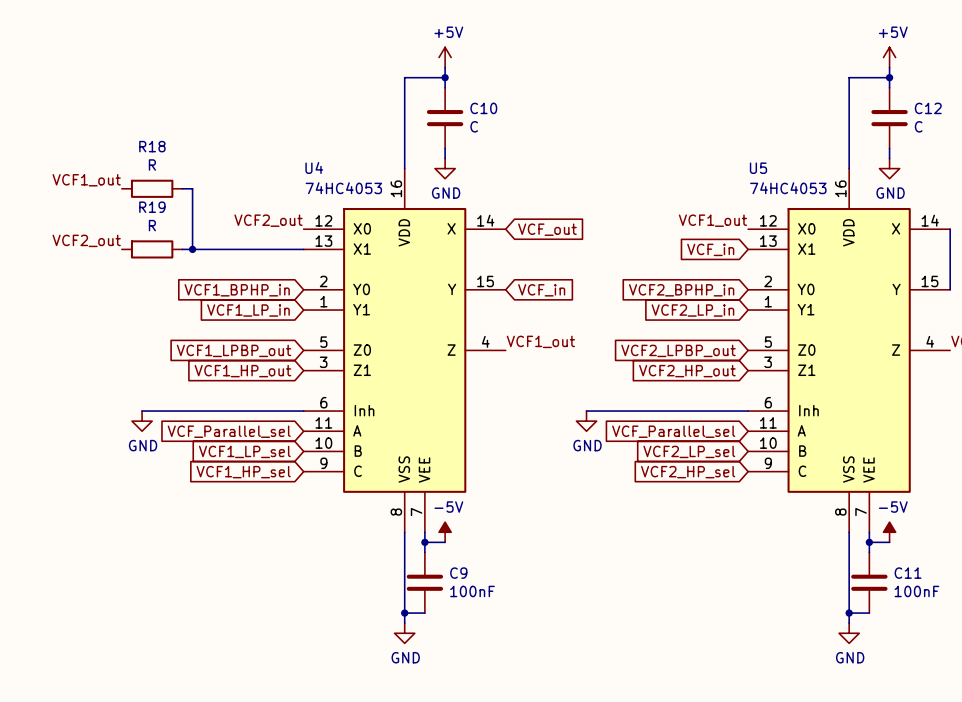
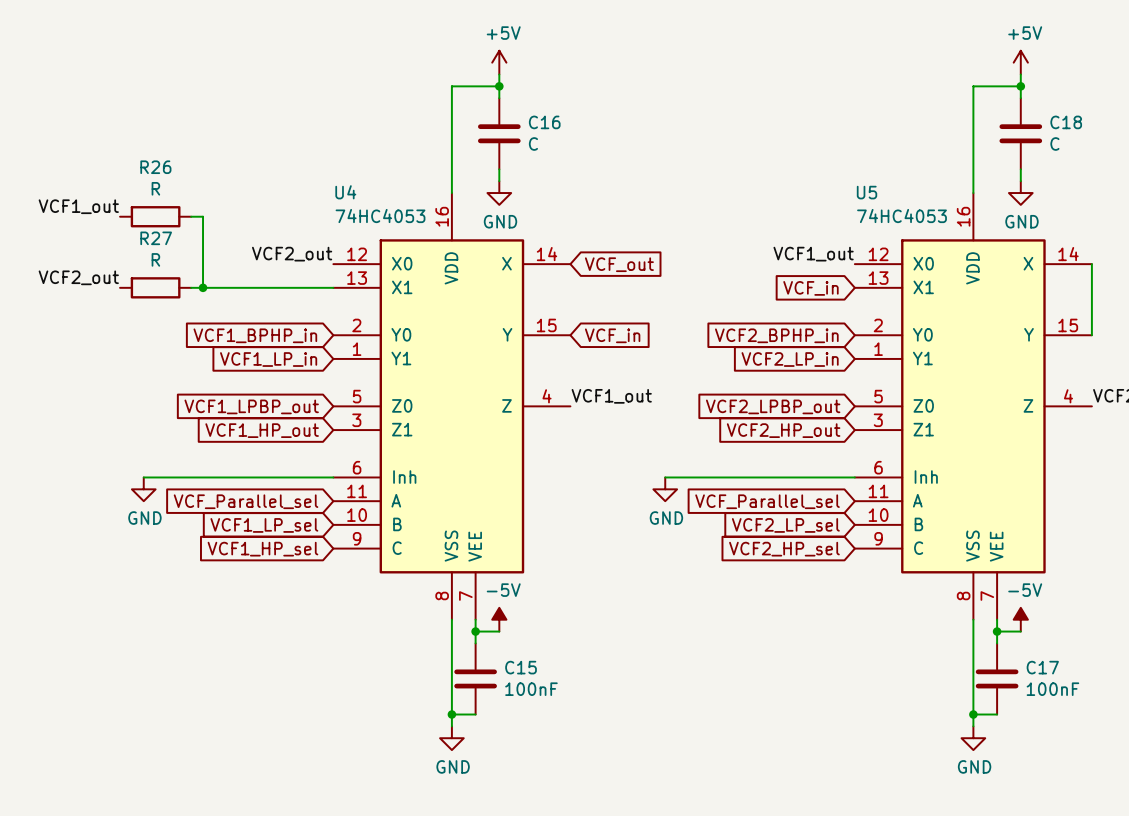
C10 name: C10 (483, 108) -> C16 (544, 122)
C12 name: C12 (928, 108) -> C18 (1066, 122)
R18 name: R18 (152, 146) -> R26 (155, 167)
R19 name: R19 (152, 207) -> R27 (156, 238)
C9 name: C9 (458, 573) -> C15 (521, 667)
C11 name: C11 (908, 573) -> C17 (1042, 667)

